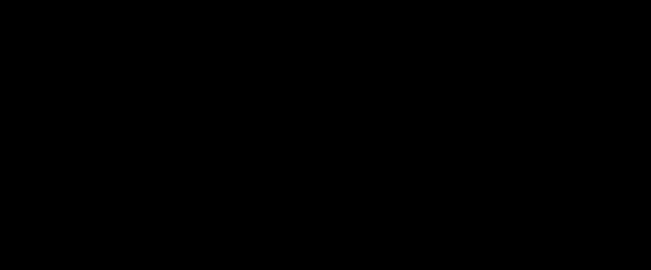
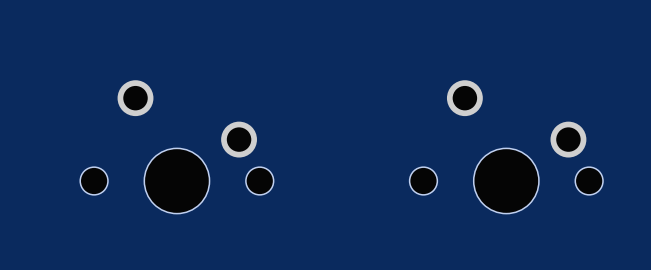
part: none -> (176, 146)
part: none -> (506, 146)

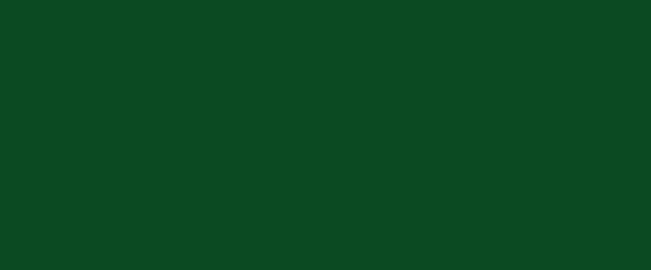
part: (176, 146) -> none
part: (506, 146) -> none

